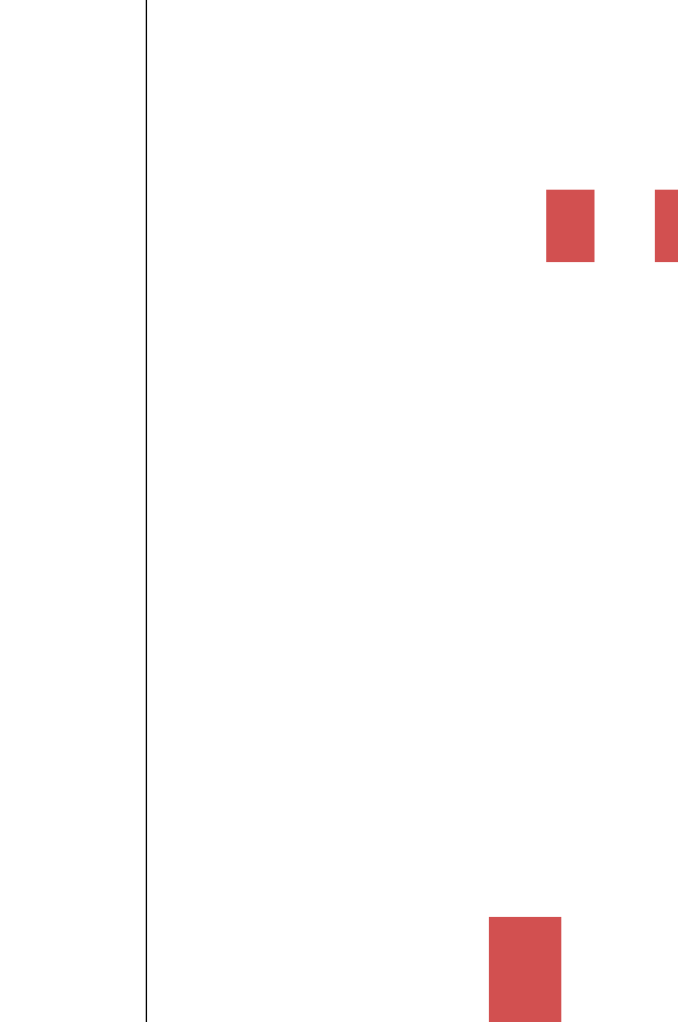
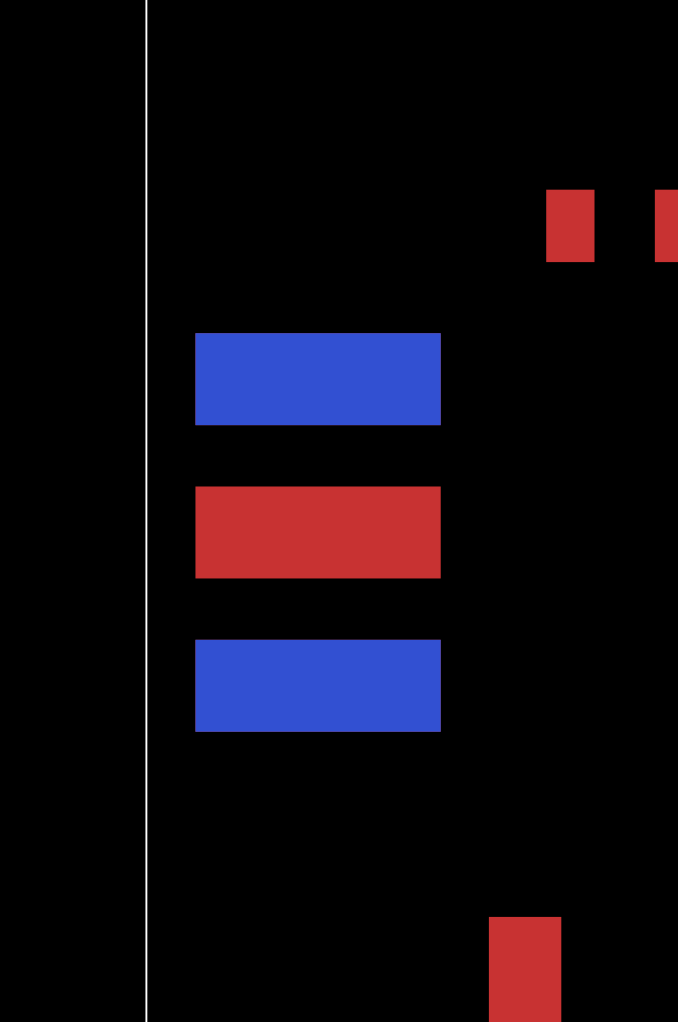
part: none -> (318, 532)

